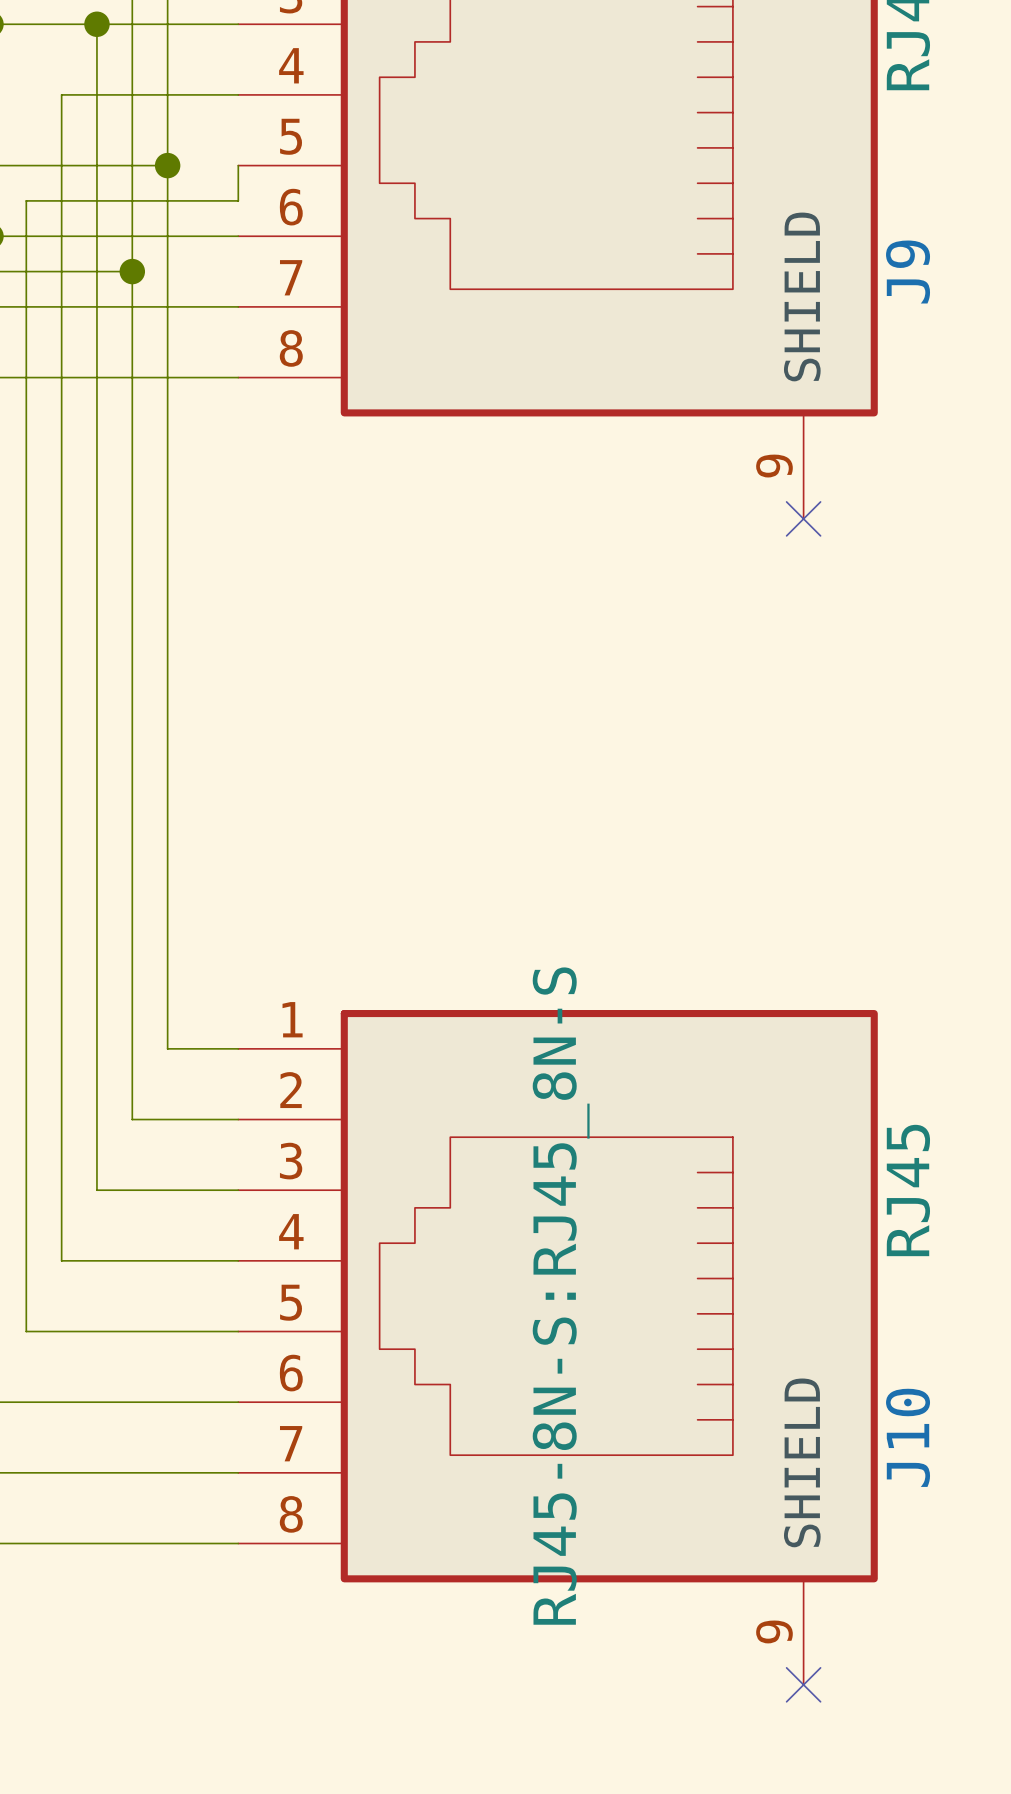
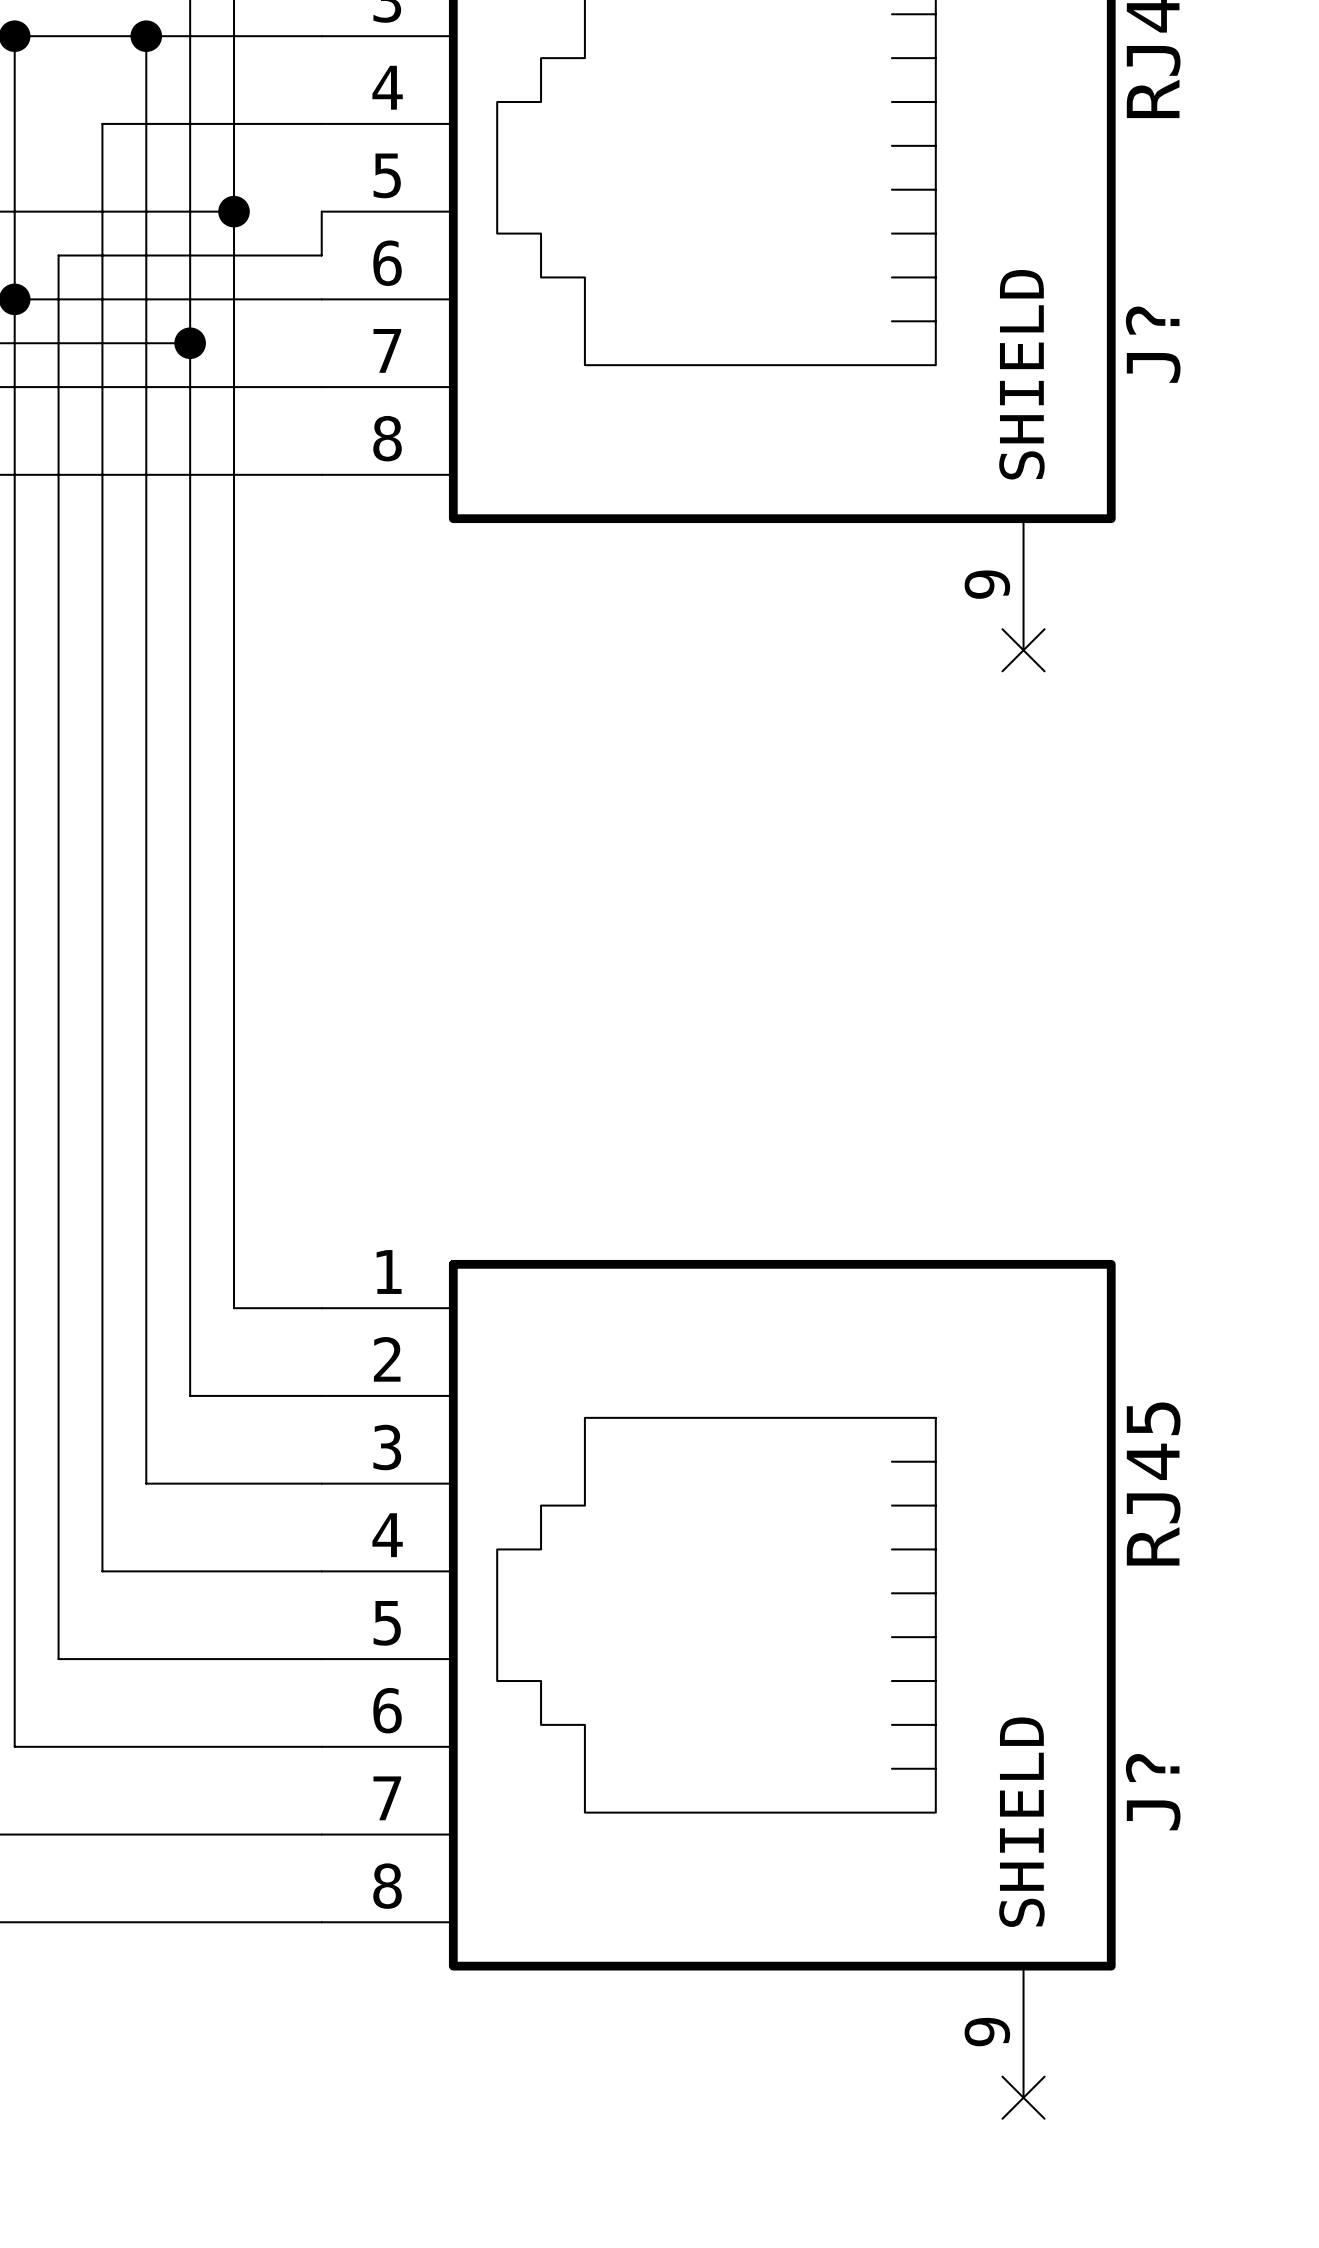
J9 name: J9 (908, 272) -> J? (1153, 344)
J10 text: RJ45-8N-S:RJ45_8N-S (561, 1296) -> none
J10 name: J10 (908, 1437) -> J? (1153, 1792)

